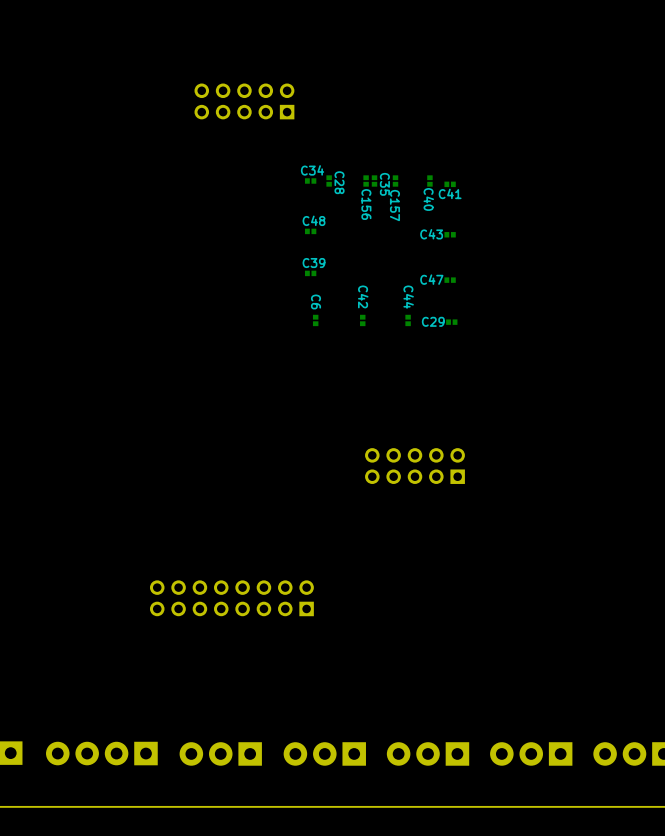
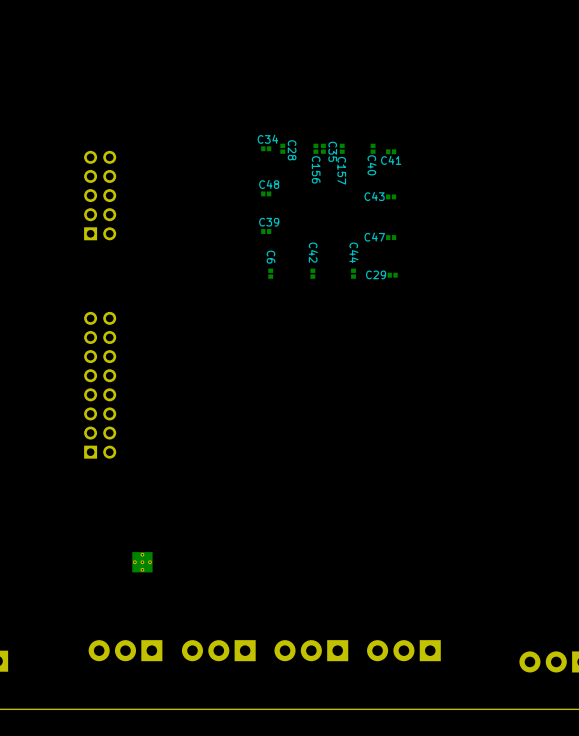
part rotation: 0° (244, 101) -> 90° clockwise (100, 195)
part position: (244, 101) -> (100, 195)
part: (414, 466) -> none
part rotation: 0° (231, 598) -> 90° clockwise (100, 385)
part position: (231, 598) -> (100, 385)
part: none -> (142, 562)
part: none -> (125, 650)
part: none -> (218, 650)
part: none -> (311, 650)
part: none -> (403, 650)
part: (101, 753) -> none
part: (220, 753) -> none
part: (324, 753) -> none
part: (428, 753) -> none
part: (531, 753) -> none

